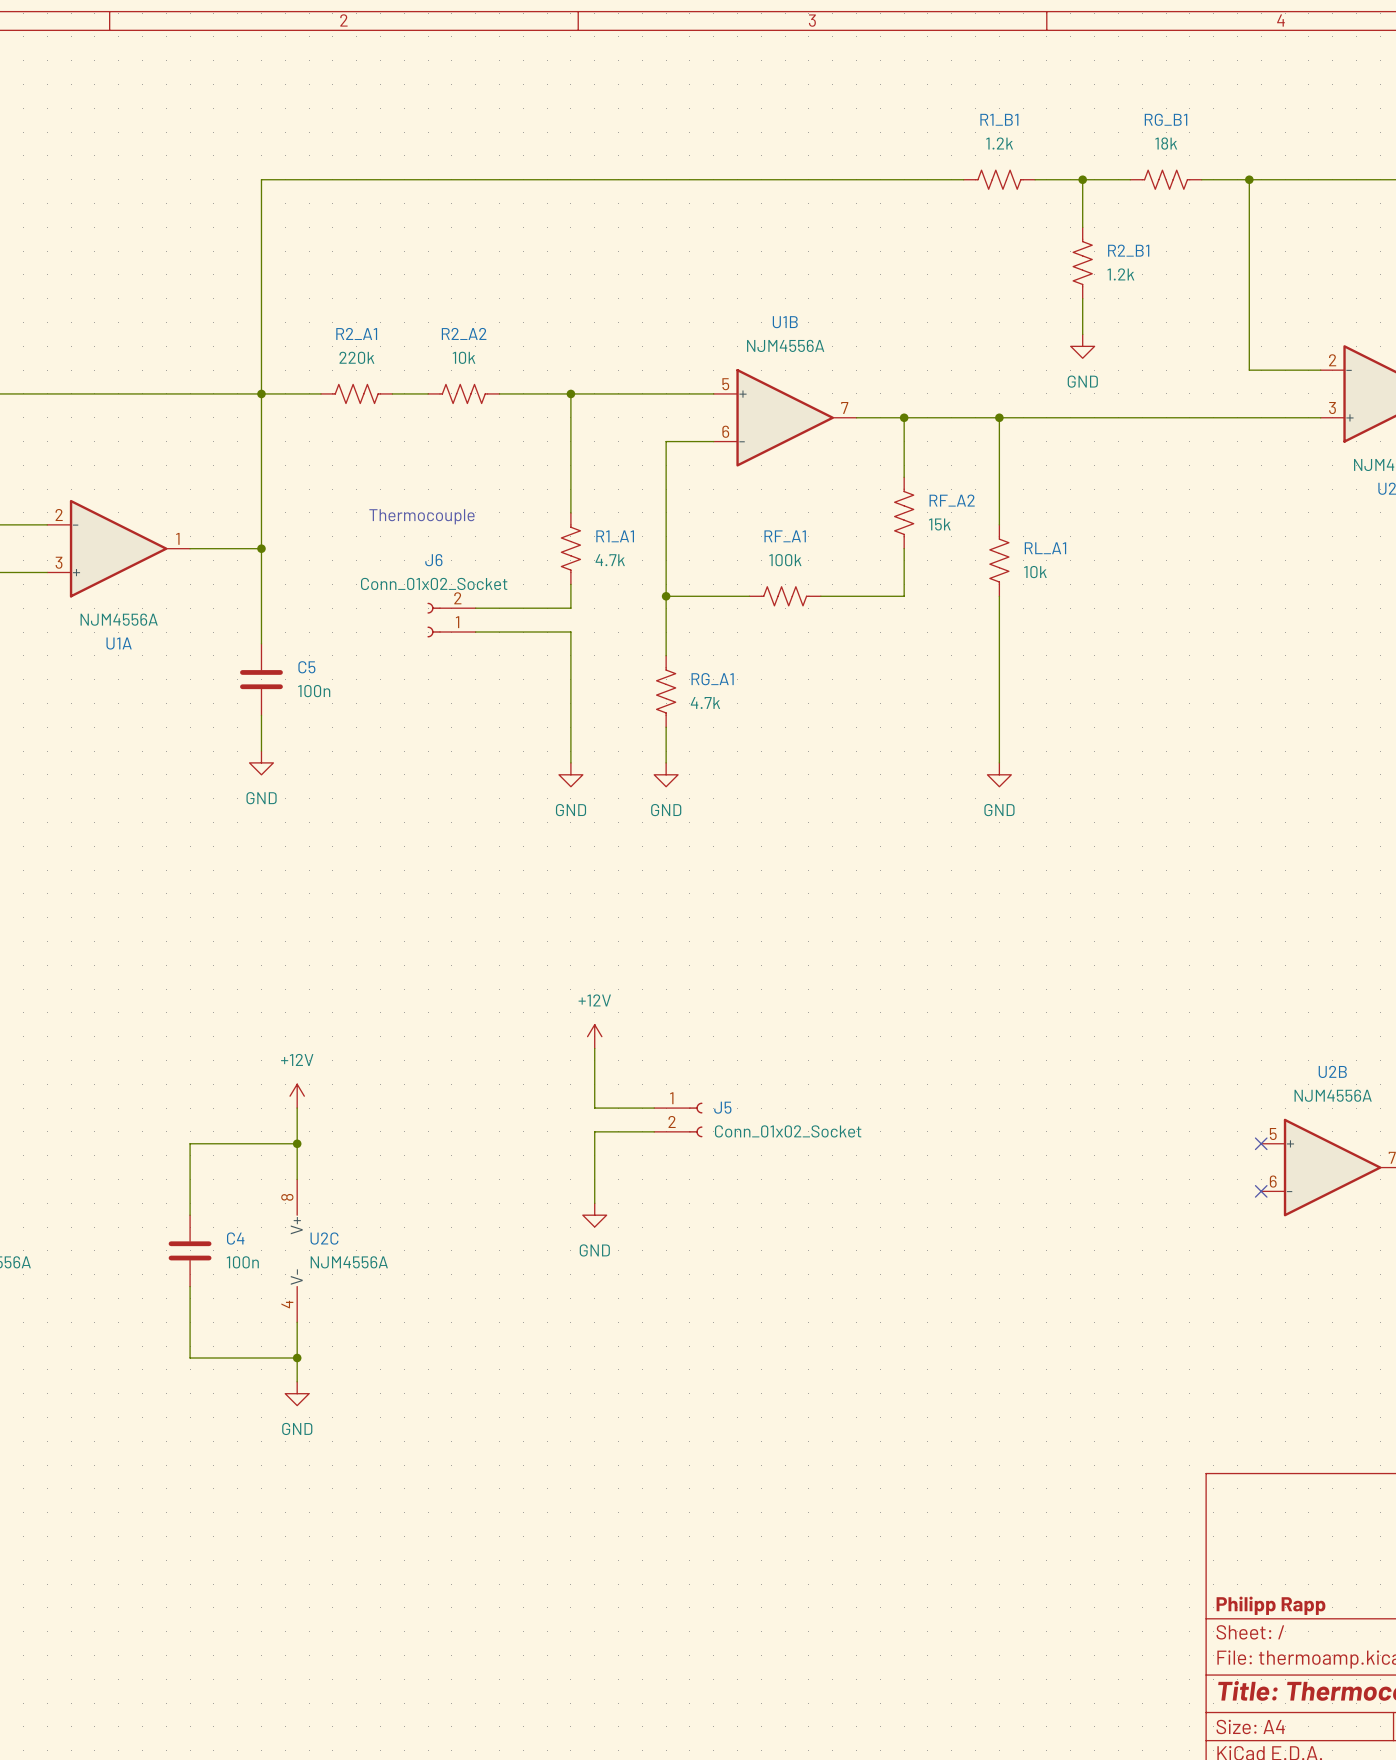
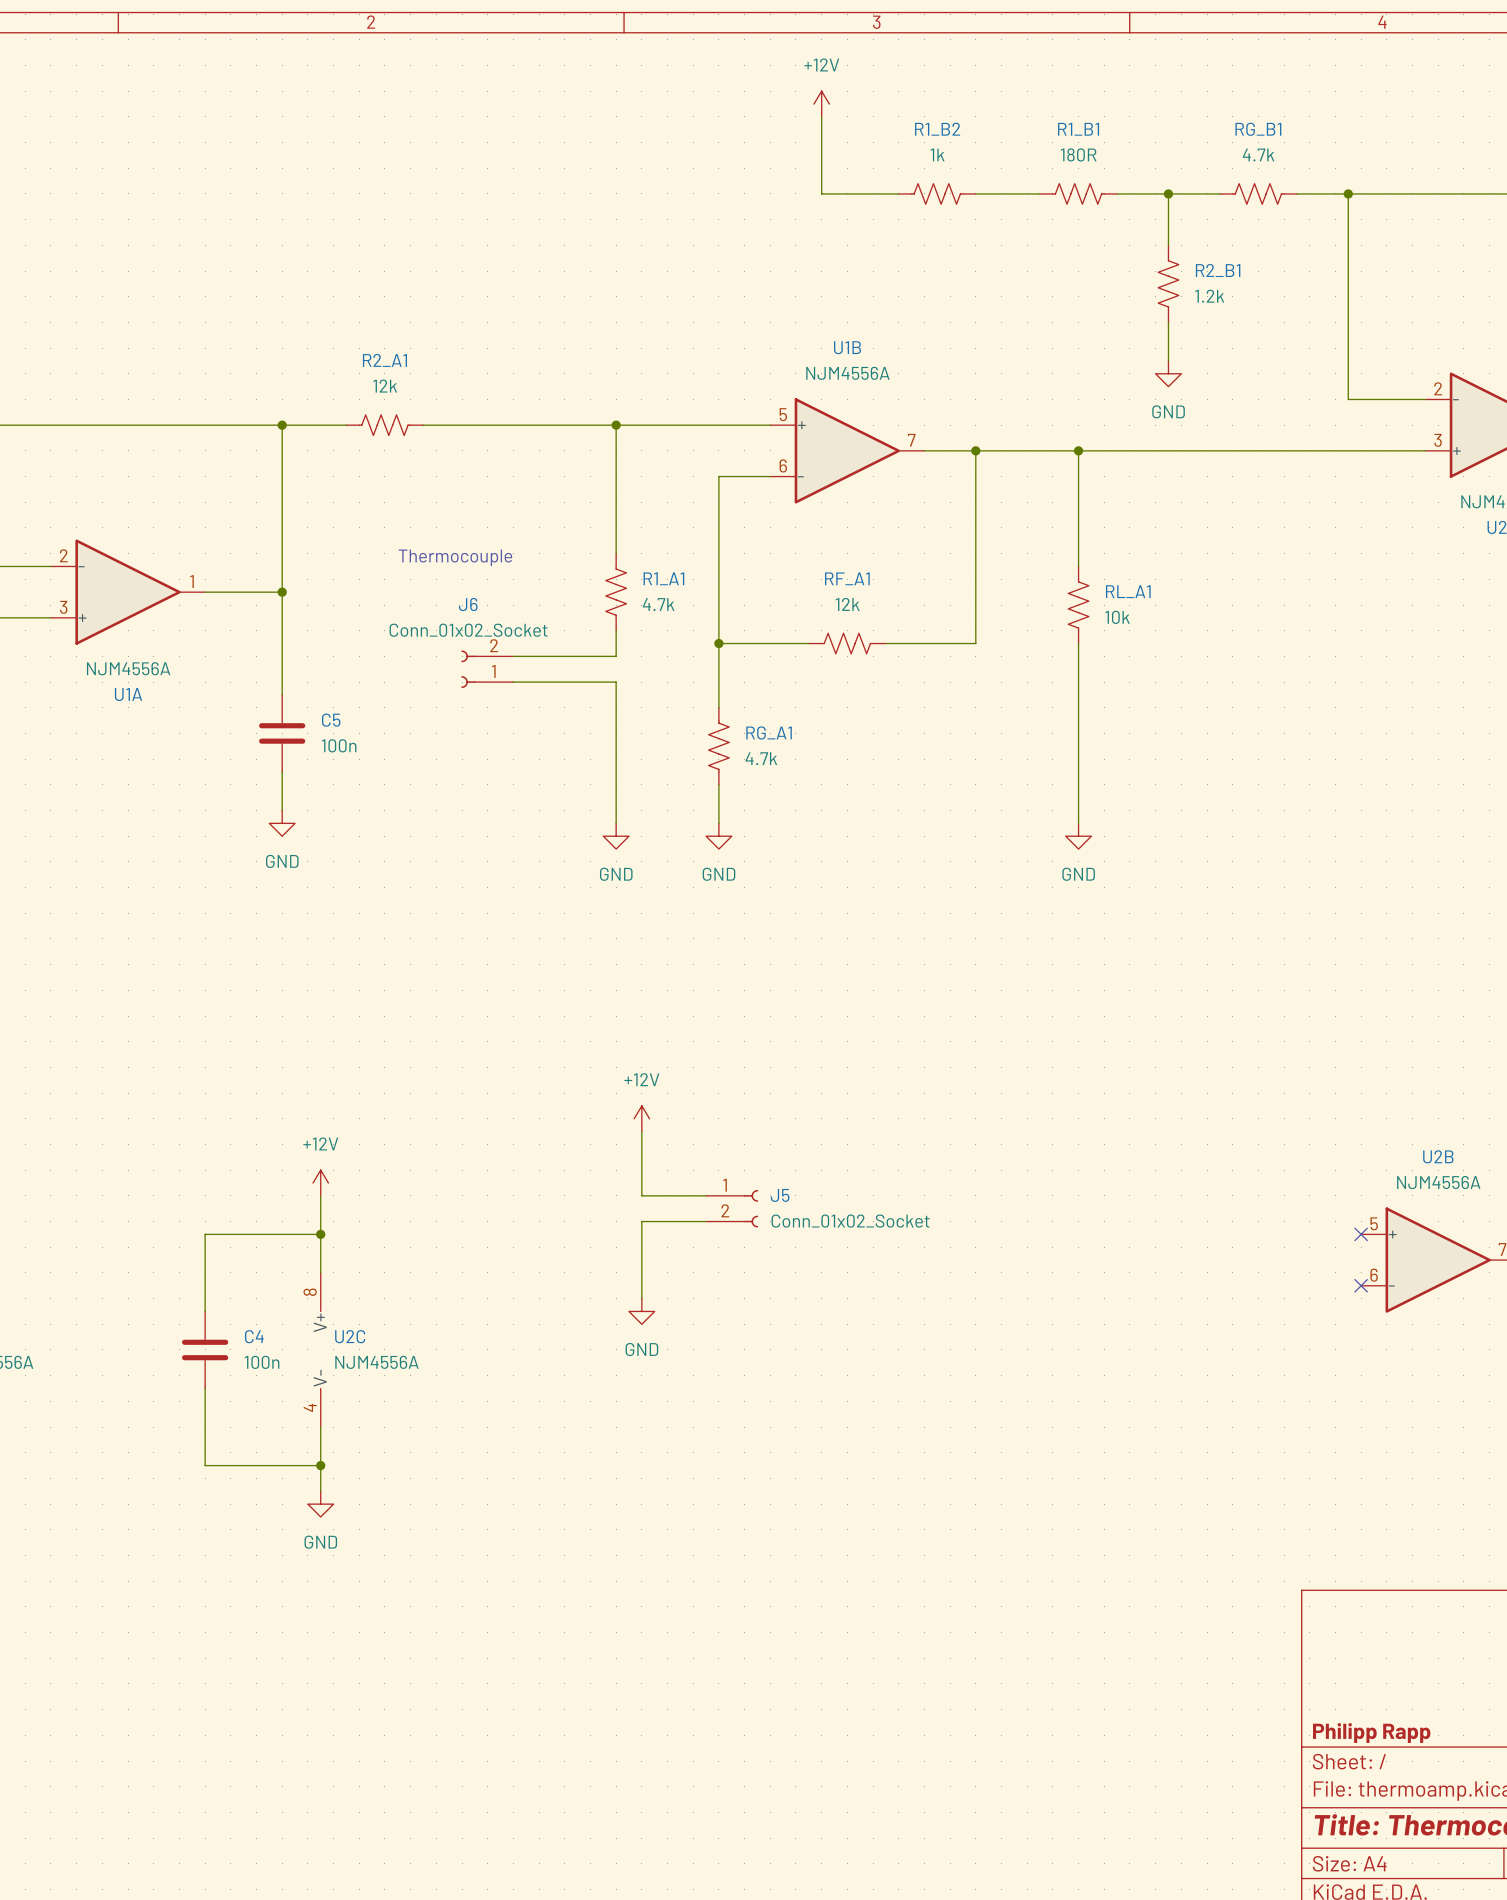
power symbol: none -> +12V (821, 104)
R1_B1 value: 1.2k (999, 143) -> 180R (1078, 154)
RG_B1 value: 18k (1166, 143) -> 4.7k (1258, 154)
wire: (761, 179) (261, 179) (261, 393) -> (821, 193) (821, 116)
R1_B2: none -> 1k (937, 193)
R2_A1 value: 220k (356, 357) -> 12k (385, 386)
R2_A2: 10k (463, 393) -> none
RF_A2: 15k (904, 512) -> none
RF_A1 value: 100k (785, 560) -> 12k (847, 604)

